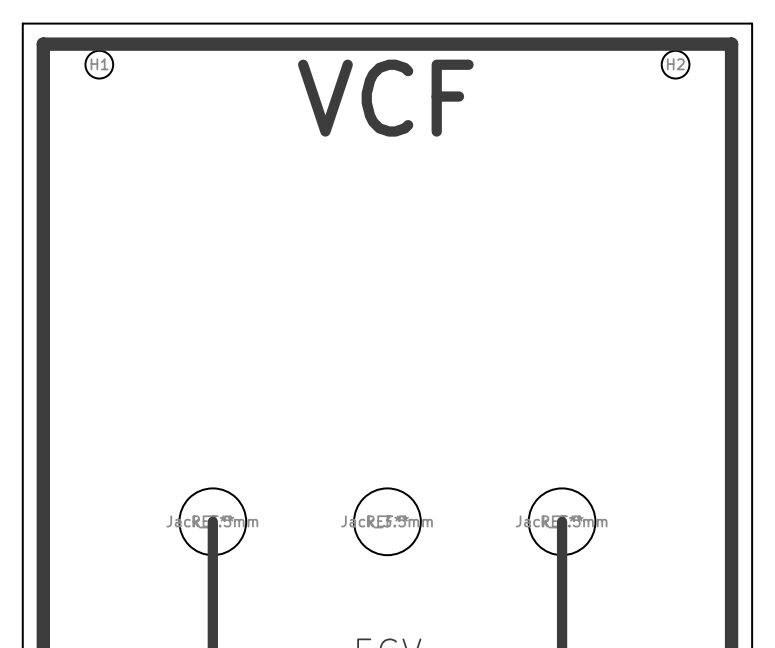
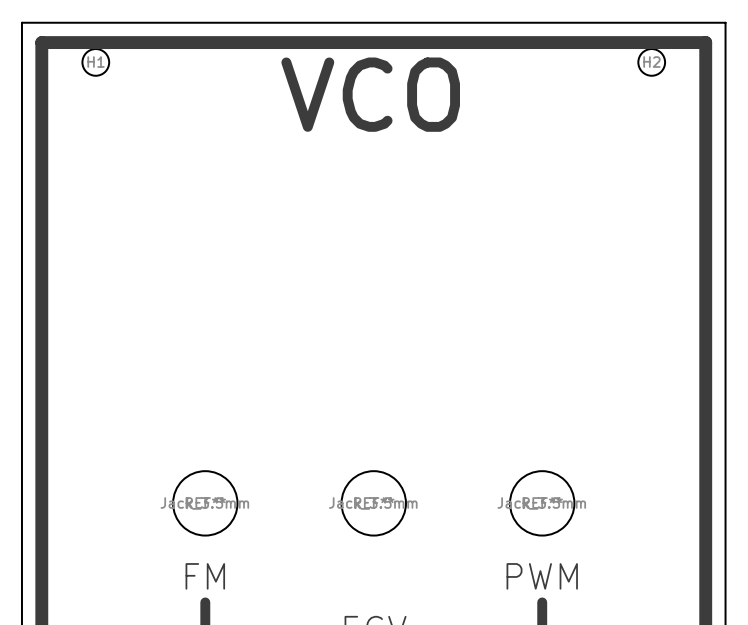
text: VCF (385, 98) -> VCO (370, 94)
line: (212, 521) (212, 624) -> none
line: (562, 521) (562, 624) -> none
text: none -> FM (205, 576)
text: none -> PWM (542, 576)

